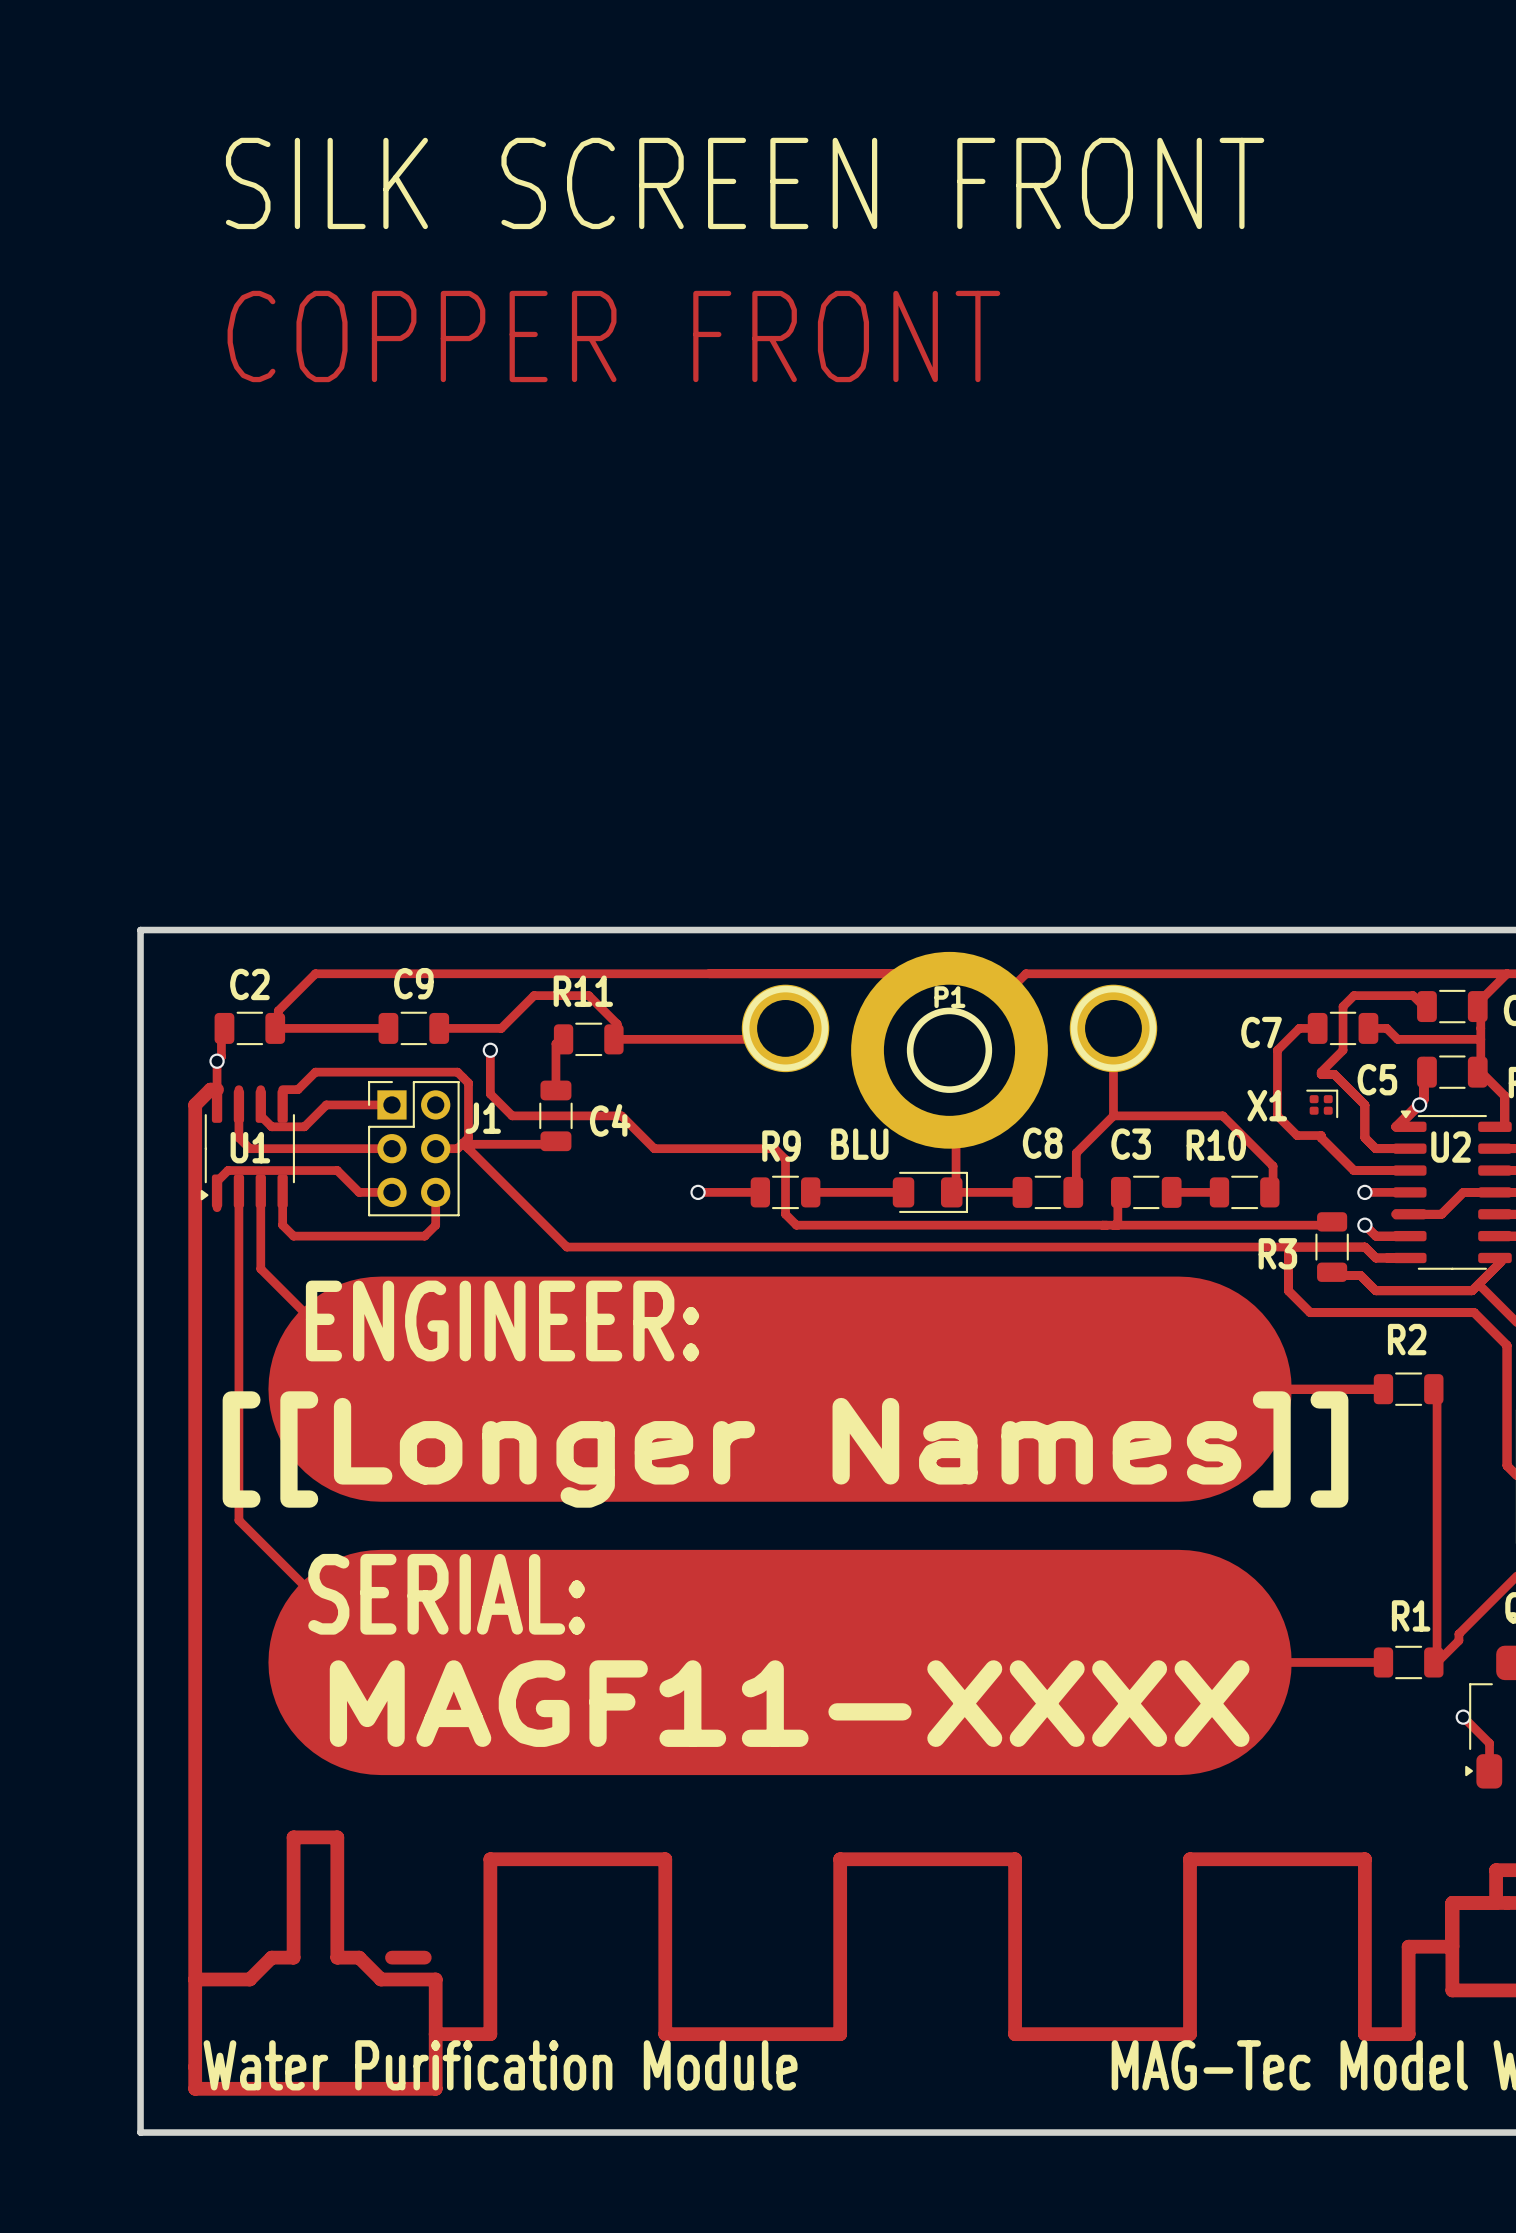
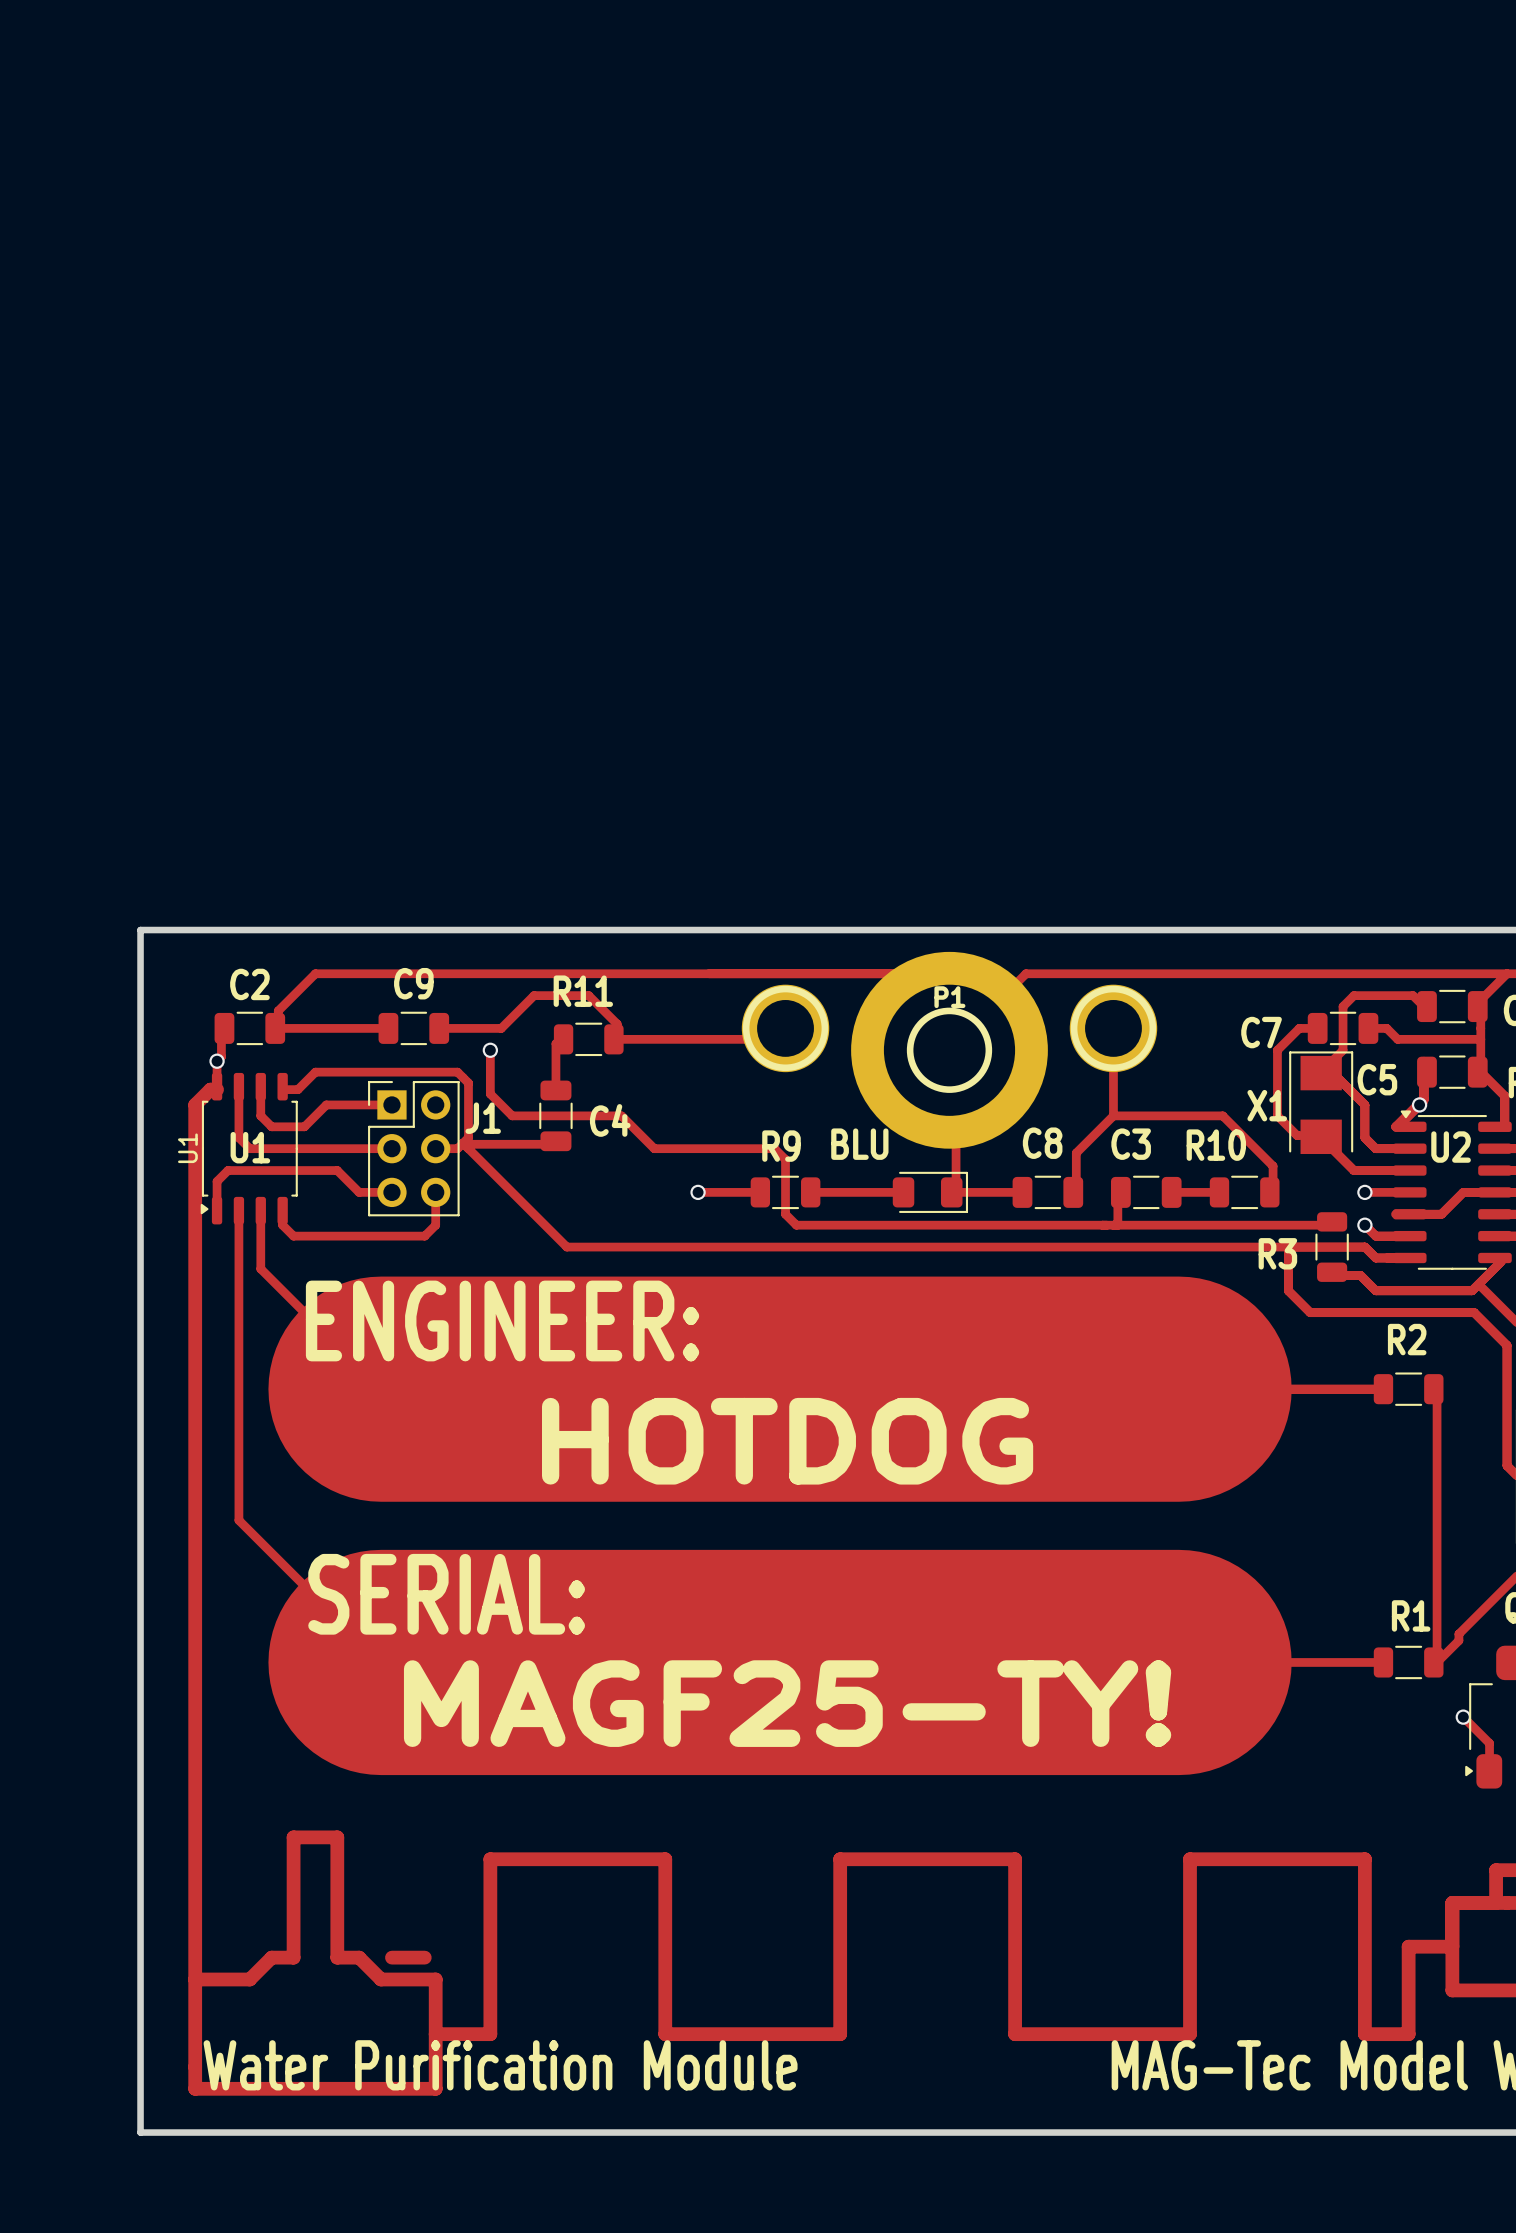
text: SILK SCREEN FRONT (745, 183) -> none
text: COPPER FRONT (613, 336) -> none
part footprint: [1306, 1089, 1339, 1119] -> [1289, 1051, 1354, 1155]
part: (247, 1148) -> none
U1: none -> (249, 1148)
text: [[Longer Names]] (785, 1449) -> HOTDOG (787, 1441)
text: MAGF11-XXXX (789, 1703) -> MAGF25-TY! (787, 1703)

